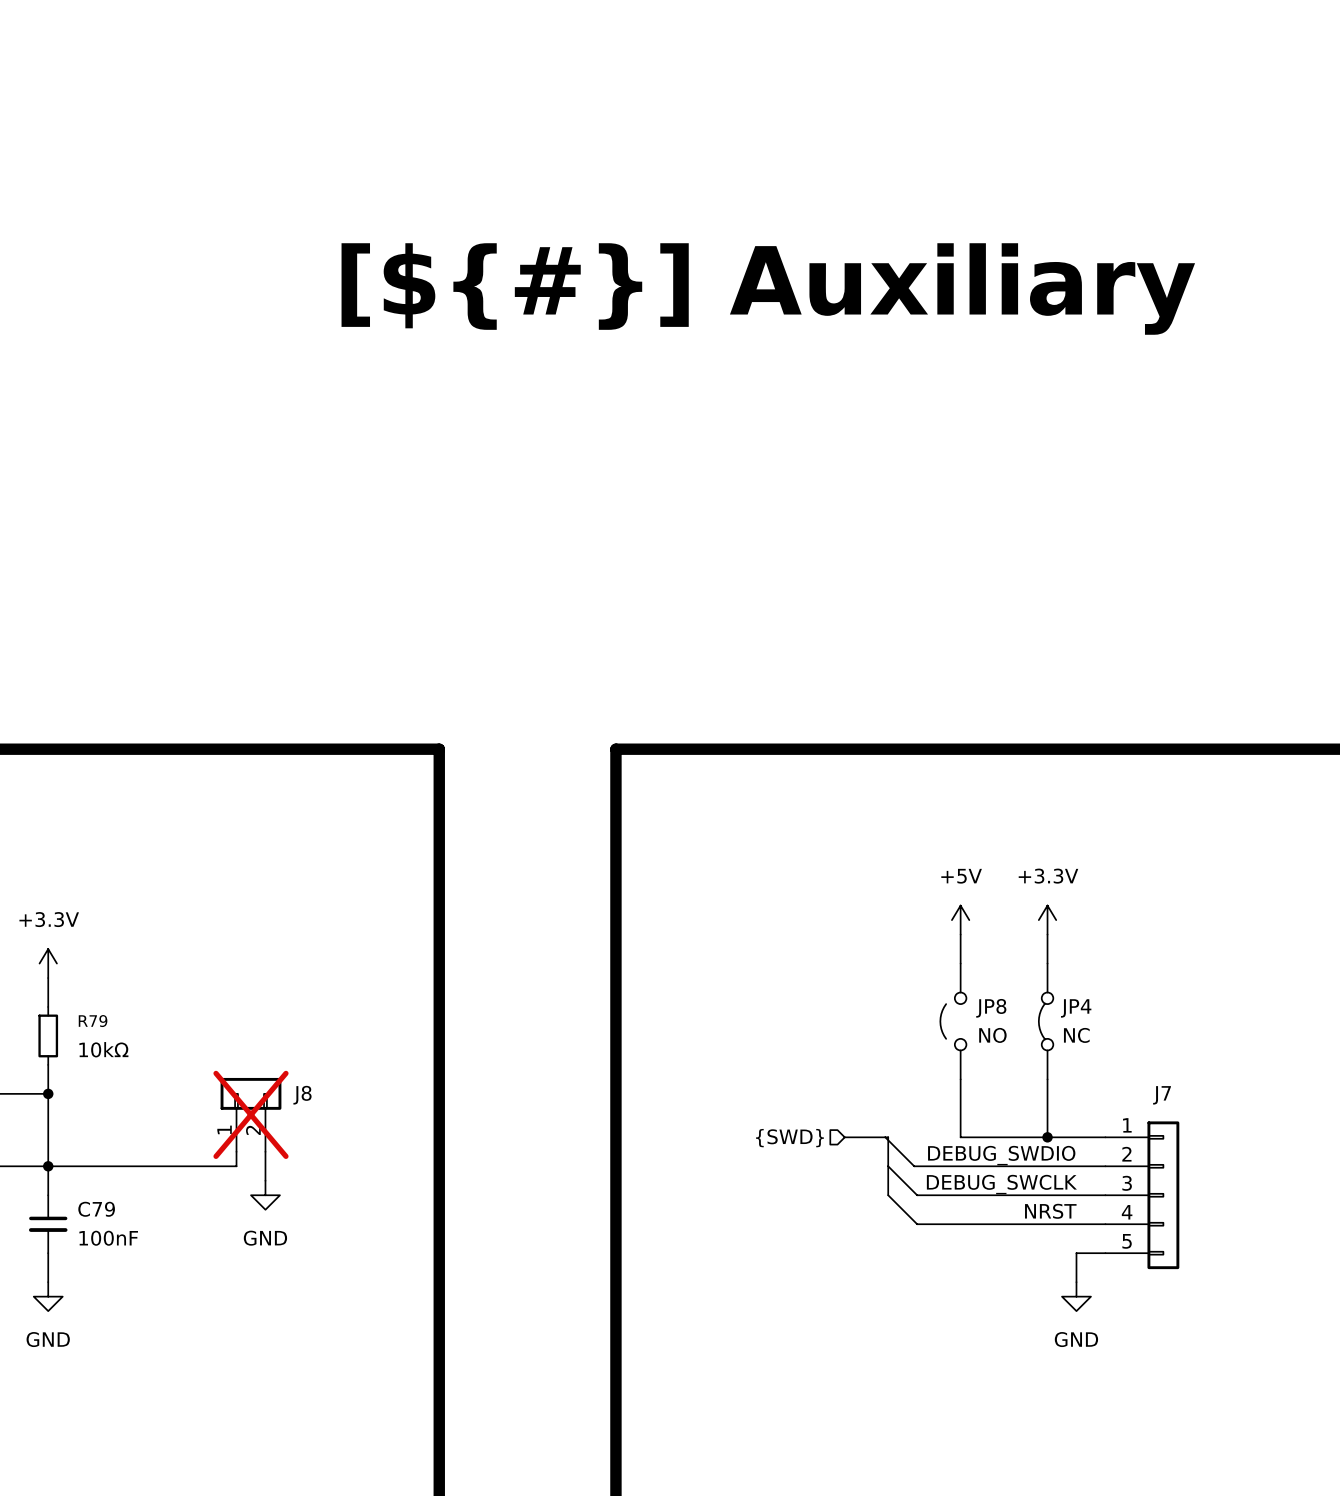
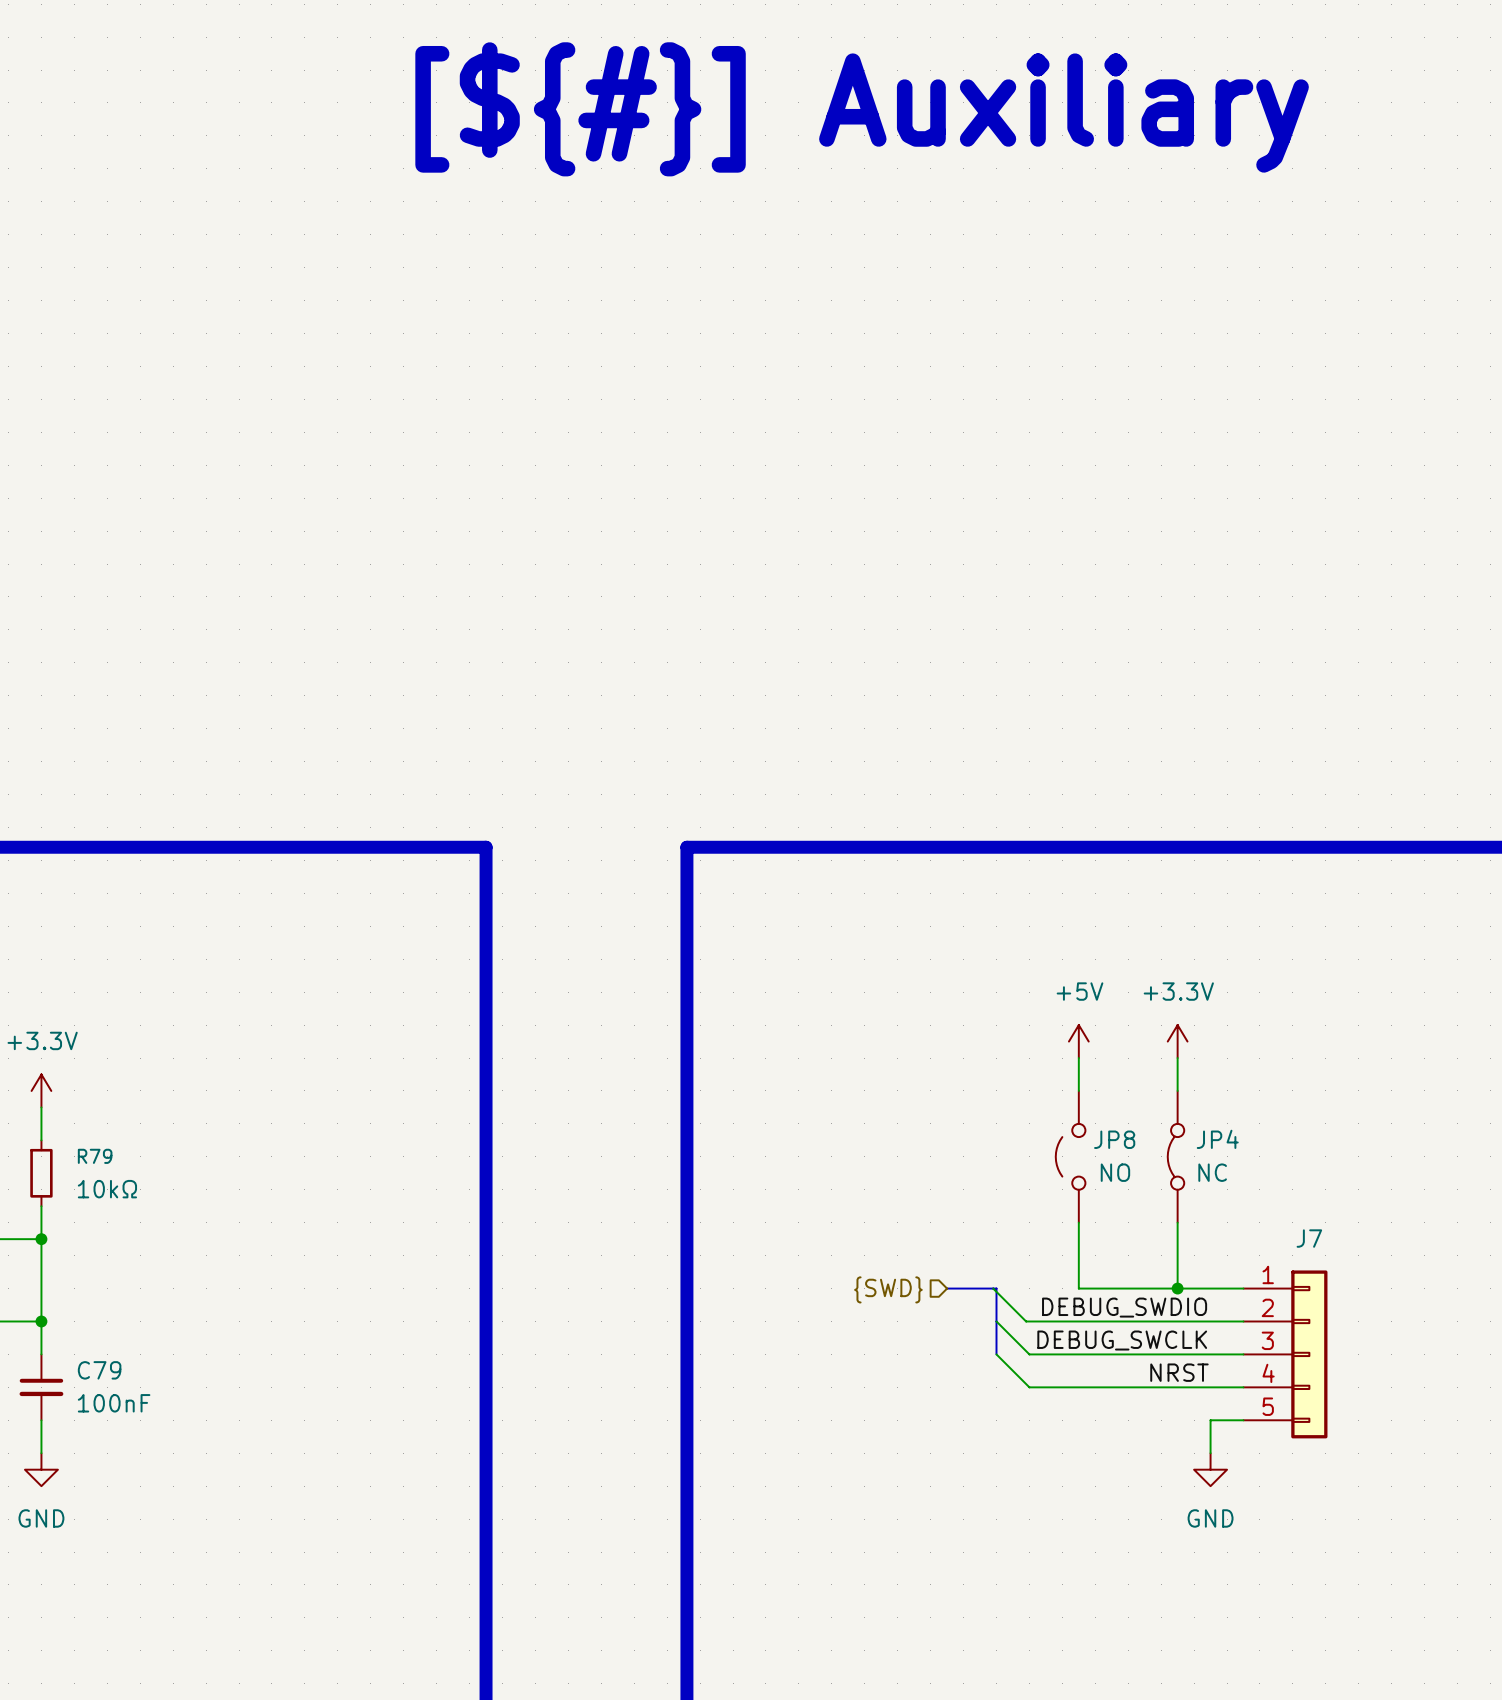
text position: [${#}] Auxiliary (768, 289) -> [${#}] Auxiliary (862, 109)
J8: (250, 1114) -> none
wire: (236, 1151) (236, 1166) (48, 1166) -> none
wire: (265, 1151) (265, 1180) -> none
power symbol: GND (265, 1195) -> none

